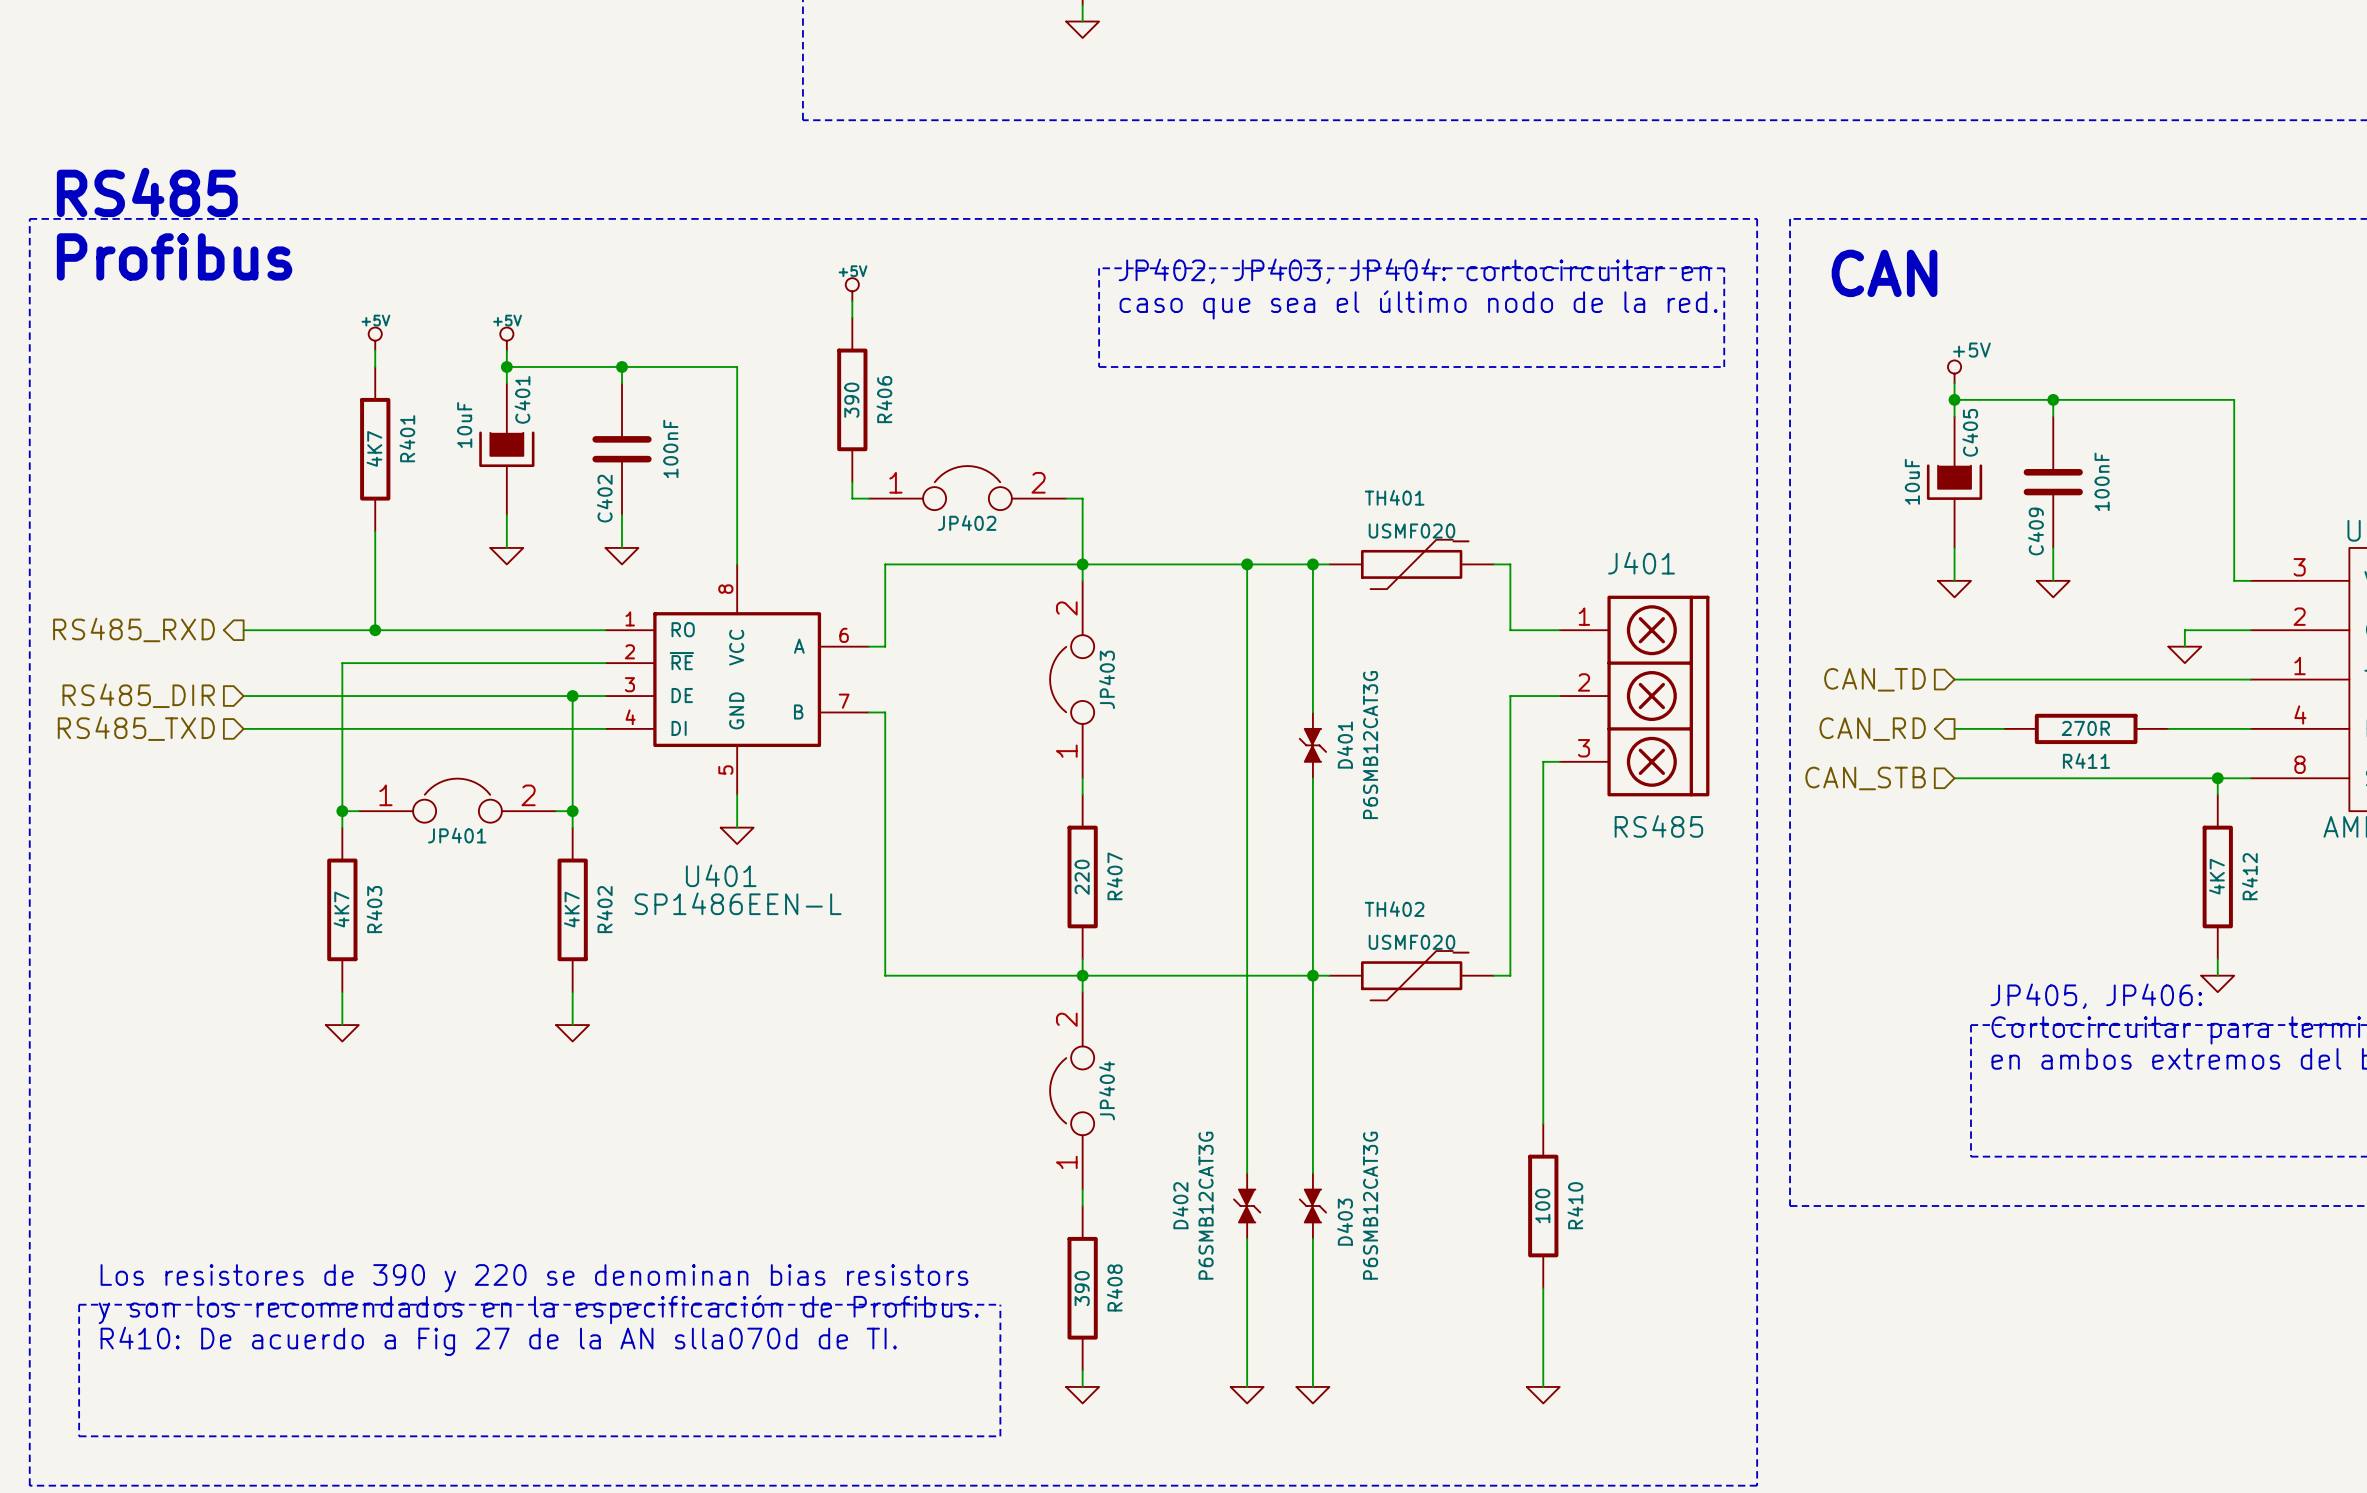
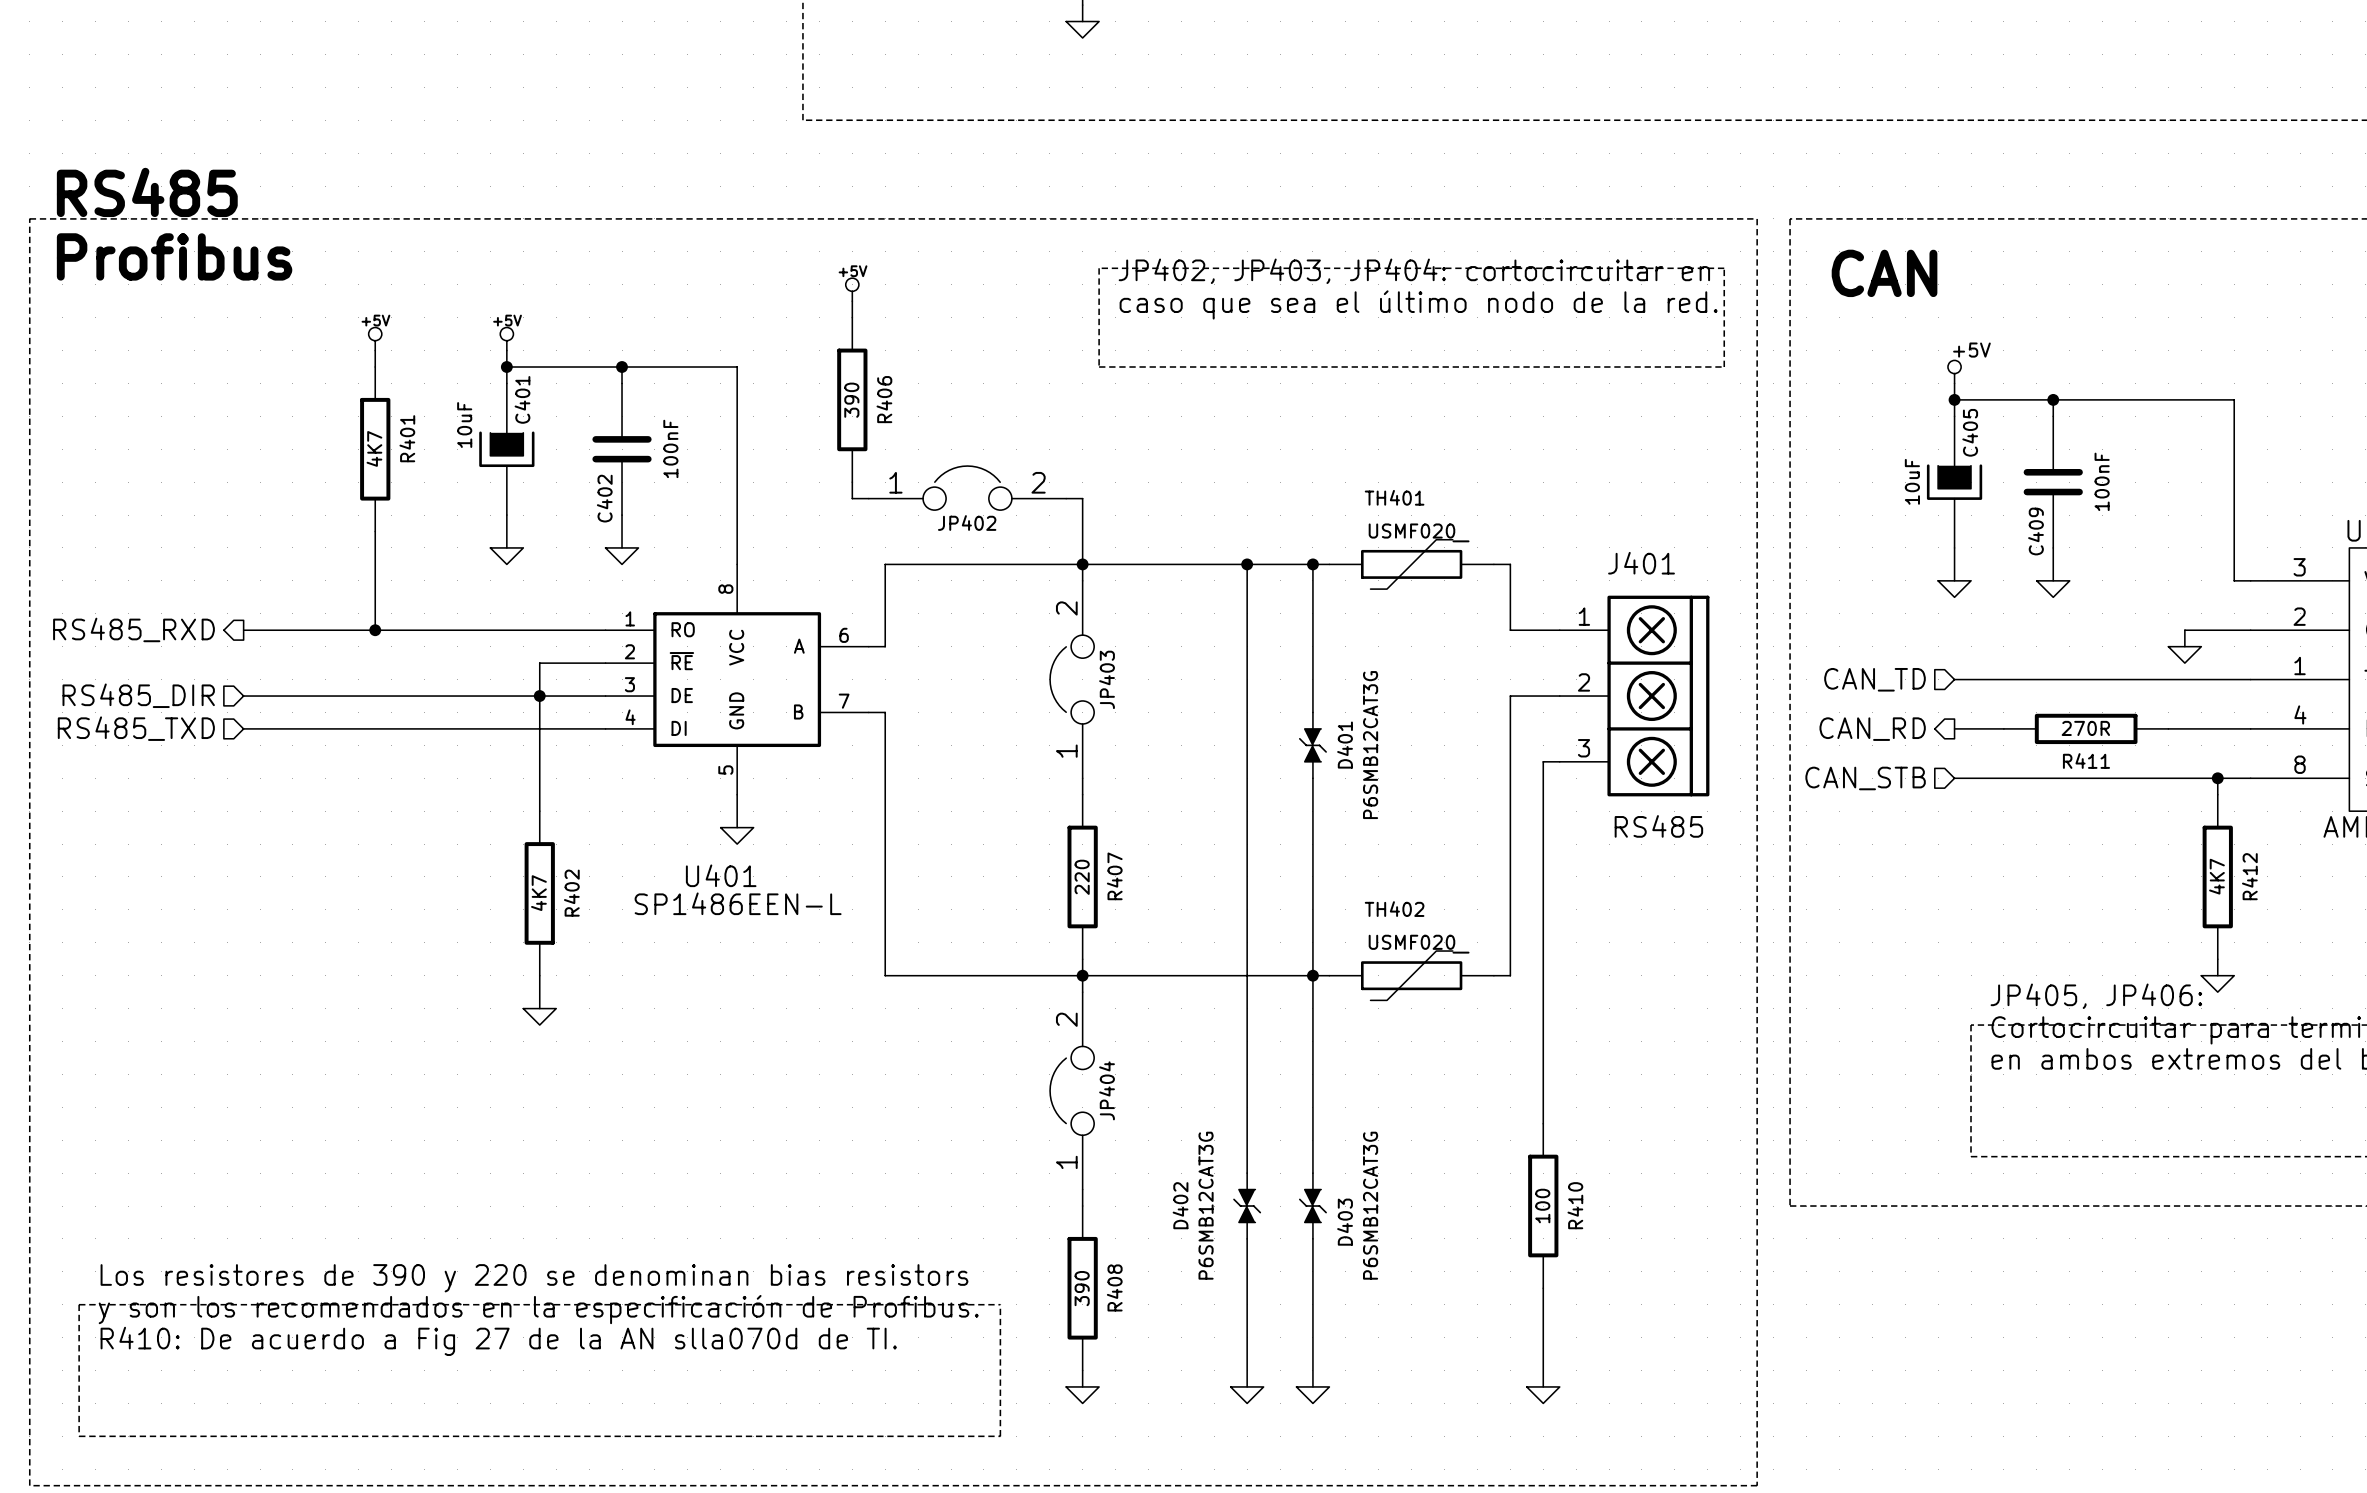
wire: (539, 663) (342, 663) (342, 827) -> (539, 663) (539, 811)
wire: (572, 696) (572, 827) -> none
junction position: (572, 696) -> (539, 696)
JP401: (457, 800) -> none
wire: (342, 811) (358, 811) -> none
junction: (342, 811) -> none
wire: (556, 811) (572, 811) -> none
junction: (572, 811) -> none
R403: 4K7 (342, 909) -> none
R402 position: (572, 909) -> (539, 893)
wire: (342, 992) (342, 1025) -> none
wire: (572, 992) (572, 1025) -> (539, 975) (539, 1008)
power symbol: (342, 1033) -> none
power symbol position: (572, 1033) -> (539, 1016)

